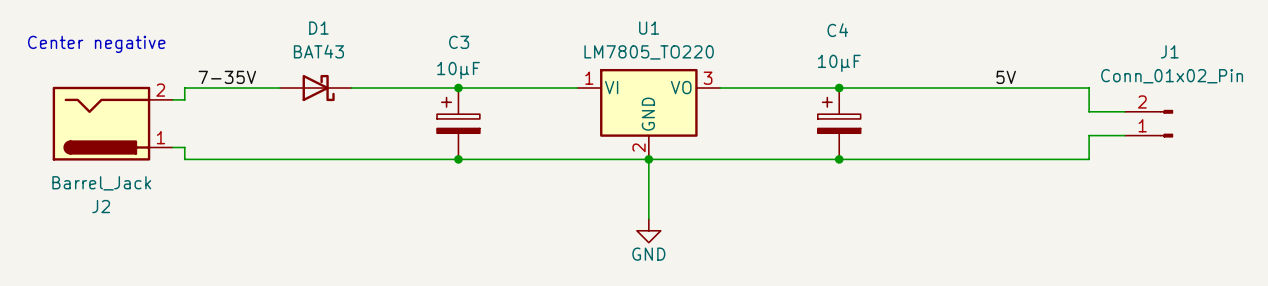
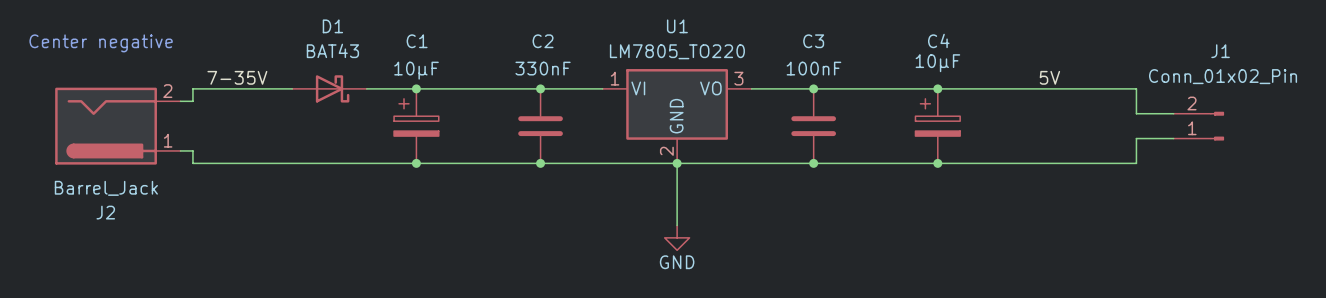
C4 name position: C4 (837, 30) -> C4 (938, 40)
C3 value: 10μF (458, 70) -> 100nF (813, 68)
junction: none -> (416, 88)
C3 symbol: [437, 88, 480, 160] -> [791, 88, 837, 164]
junction: (458, 88) -> none
junction: none -> (540, 88)
junction: none -> (813, 88)
junction: (839, 88) -> none
junction: none -> (937, 88)
C1: none -> 10μF (416, 126)
C2: none -> 330nF (540, 126)
C4 position: (839, 123) -> (937, 126)
junction: none -> (416, 163)
junction: (458, 159) -> none
junction: none -> (540, 163)
junction: none -> (813, 163)
junction: (839, 159) -> none
junction: none -> (937, 163)

